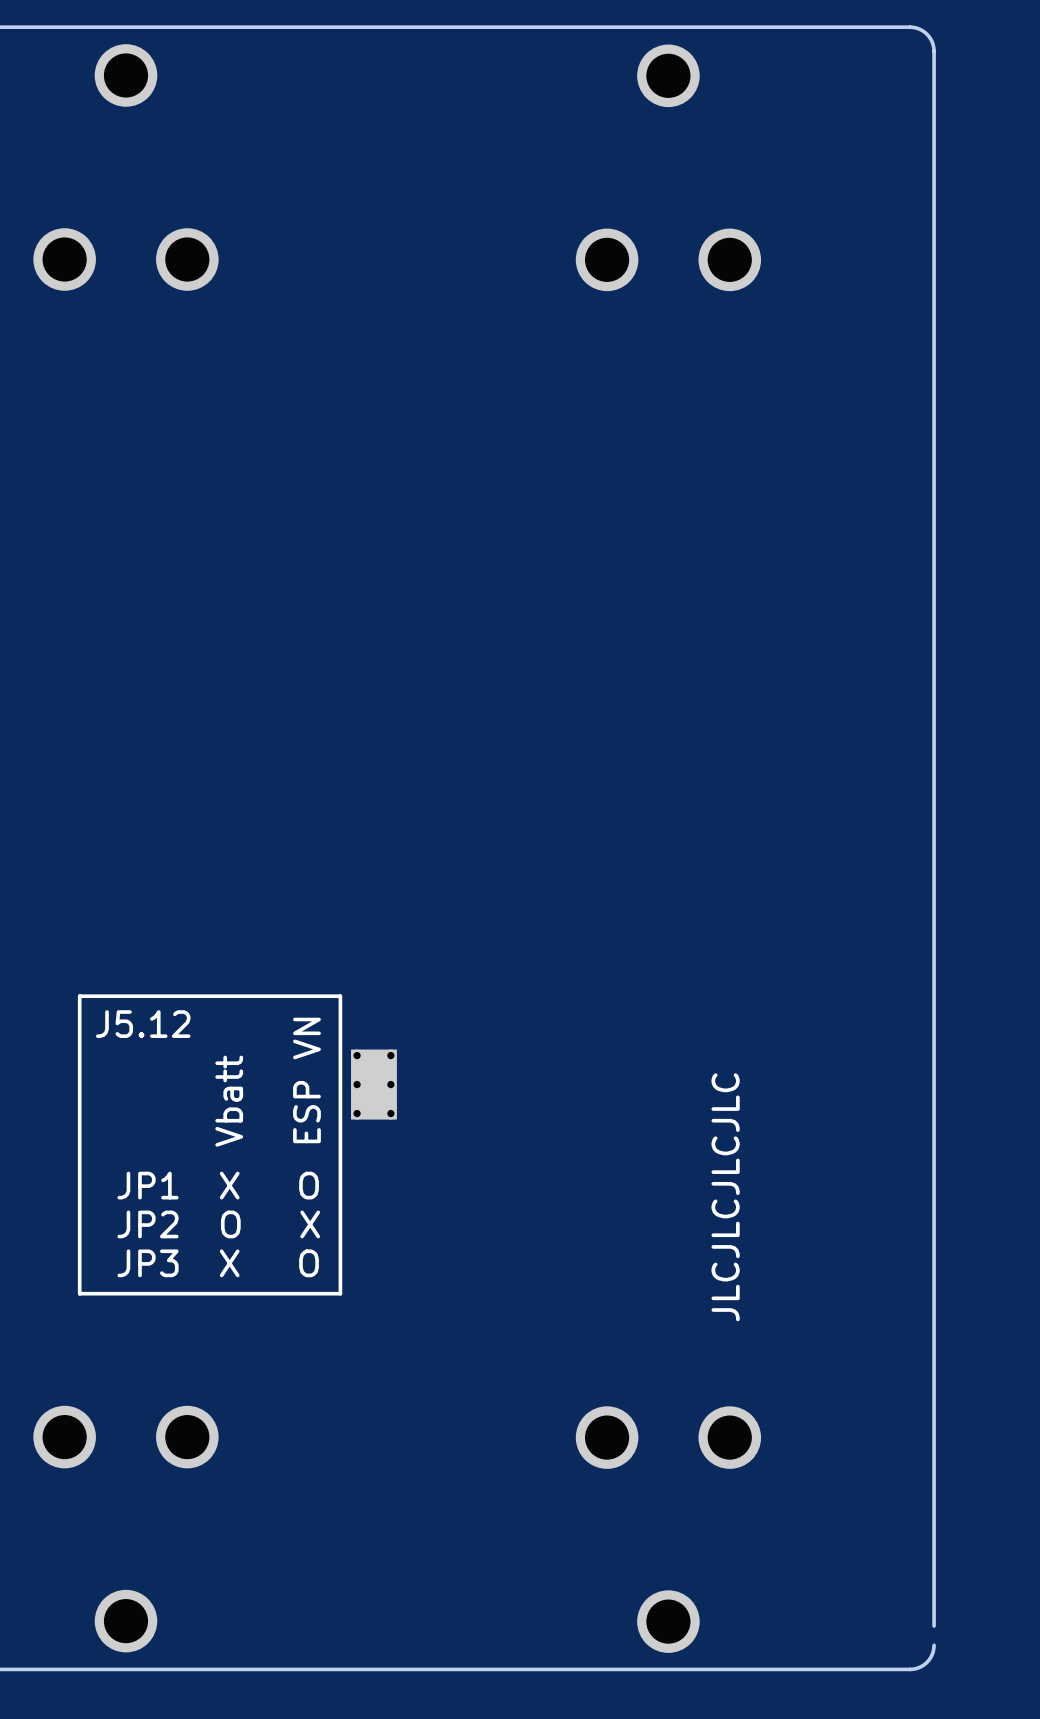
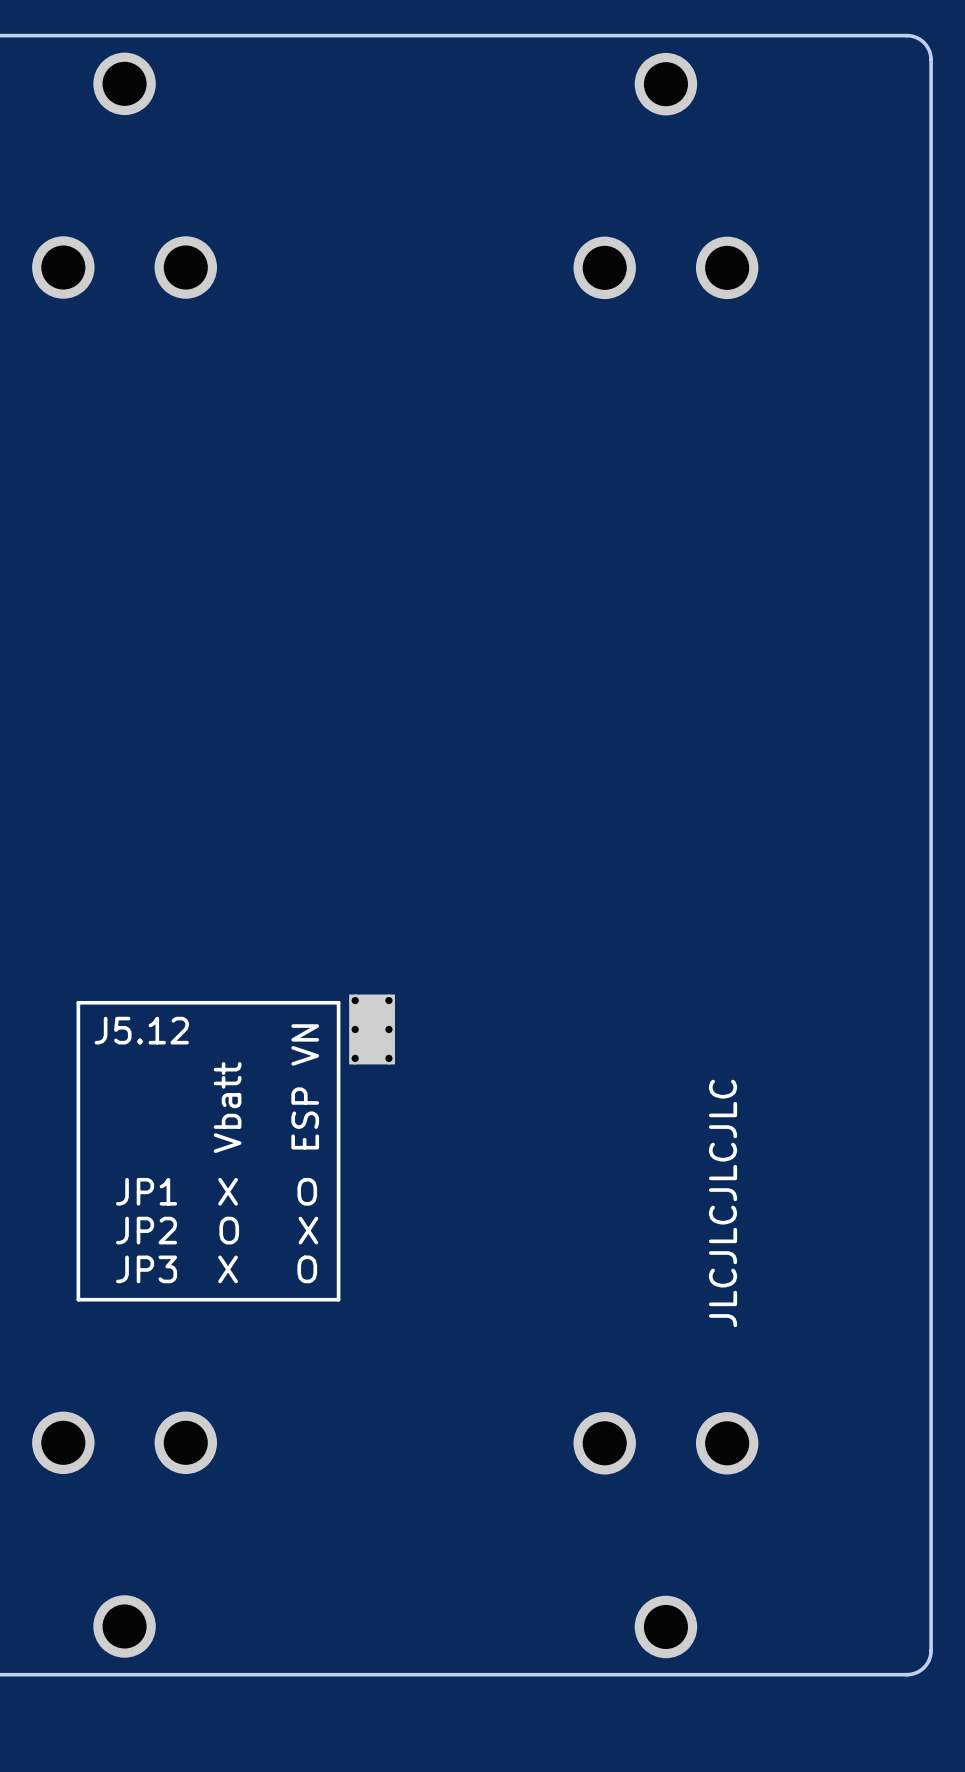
part position: (373, 1084) -> (372, 1029)
board edge: none -> (931, 1631) (931, 1650)

